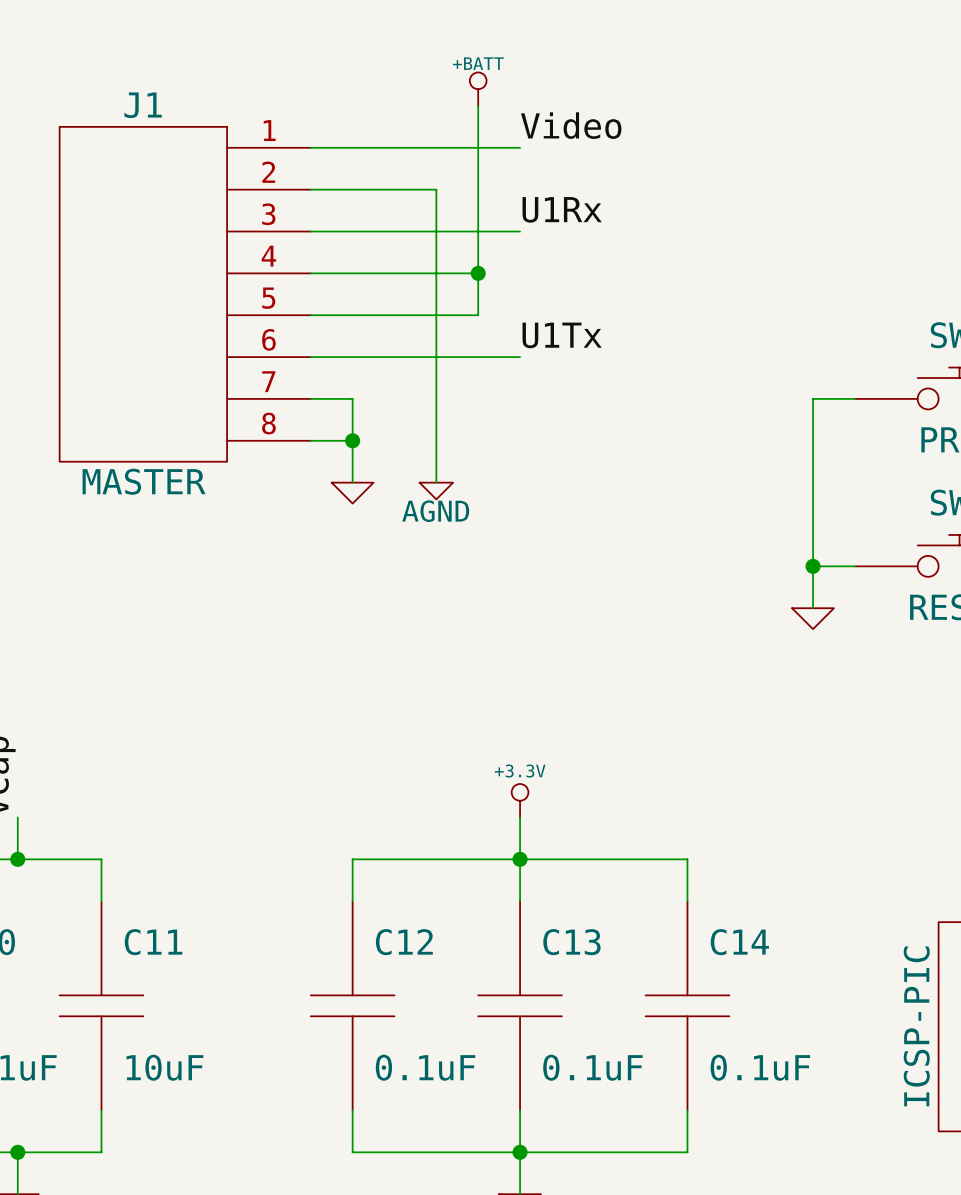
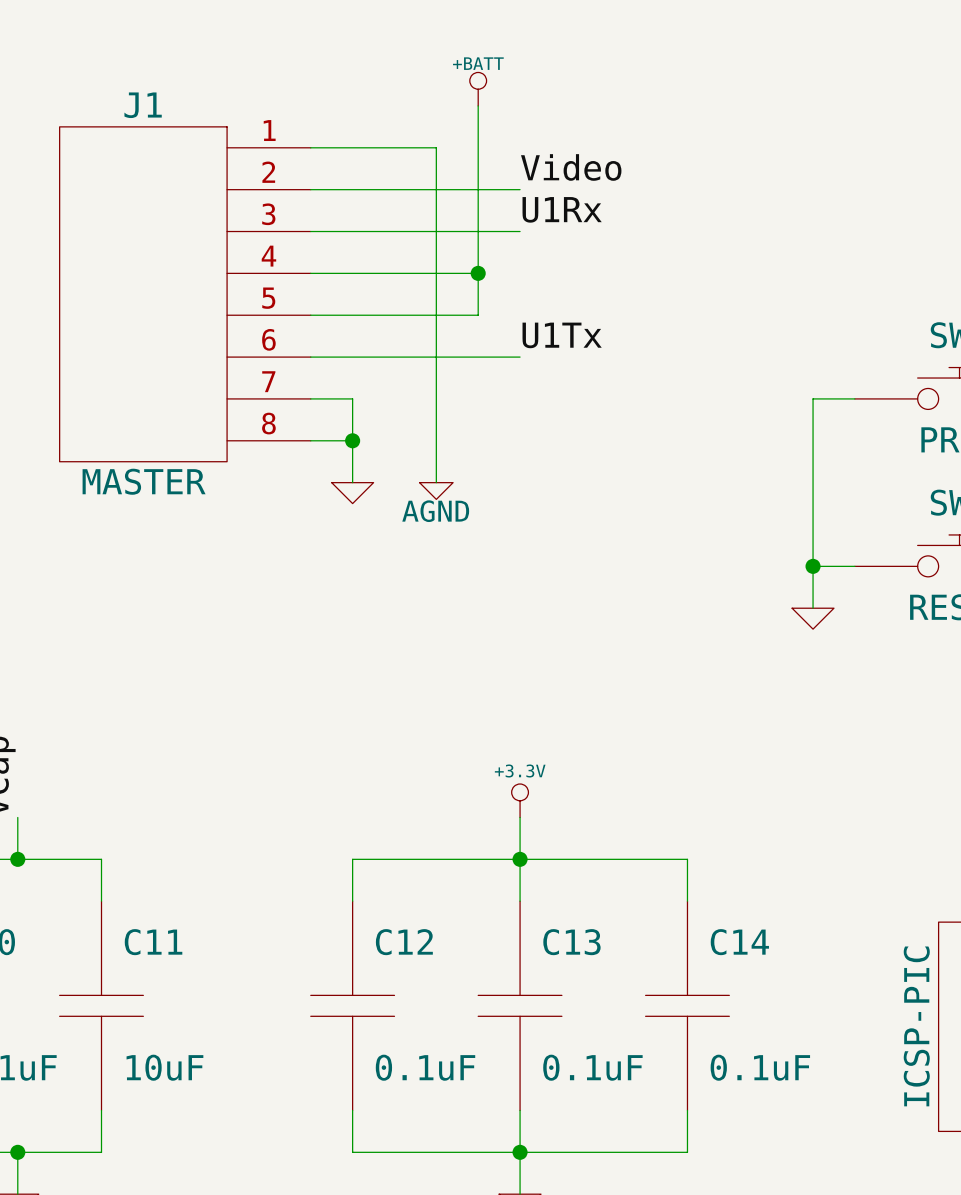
label position: Video (571, 125) -> Video (571, 167)
wire: (436, 147) (520, 147) -> (436, 147) (436, 189) (520, 189)

